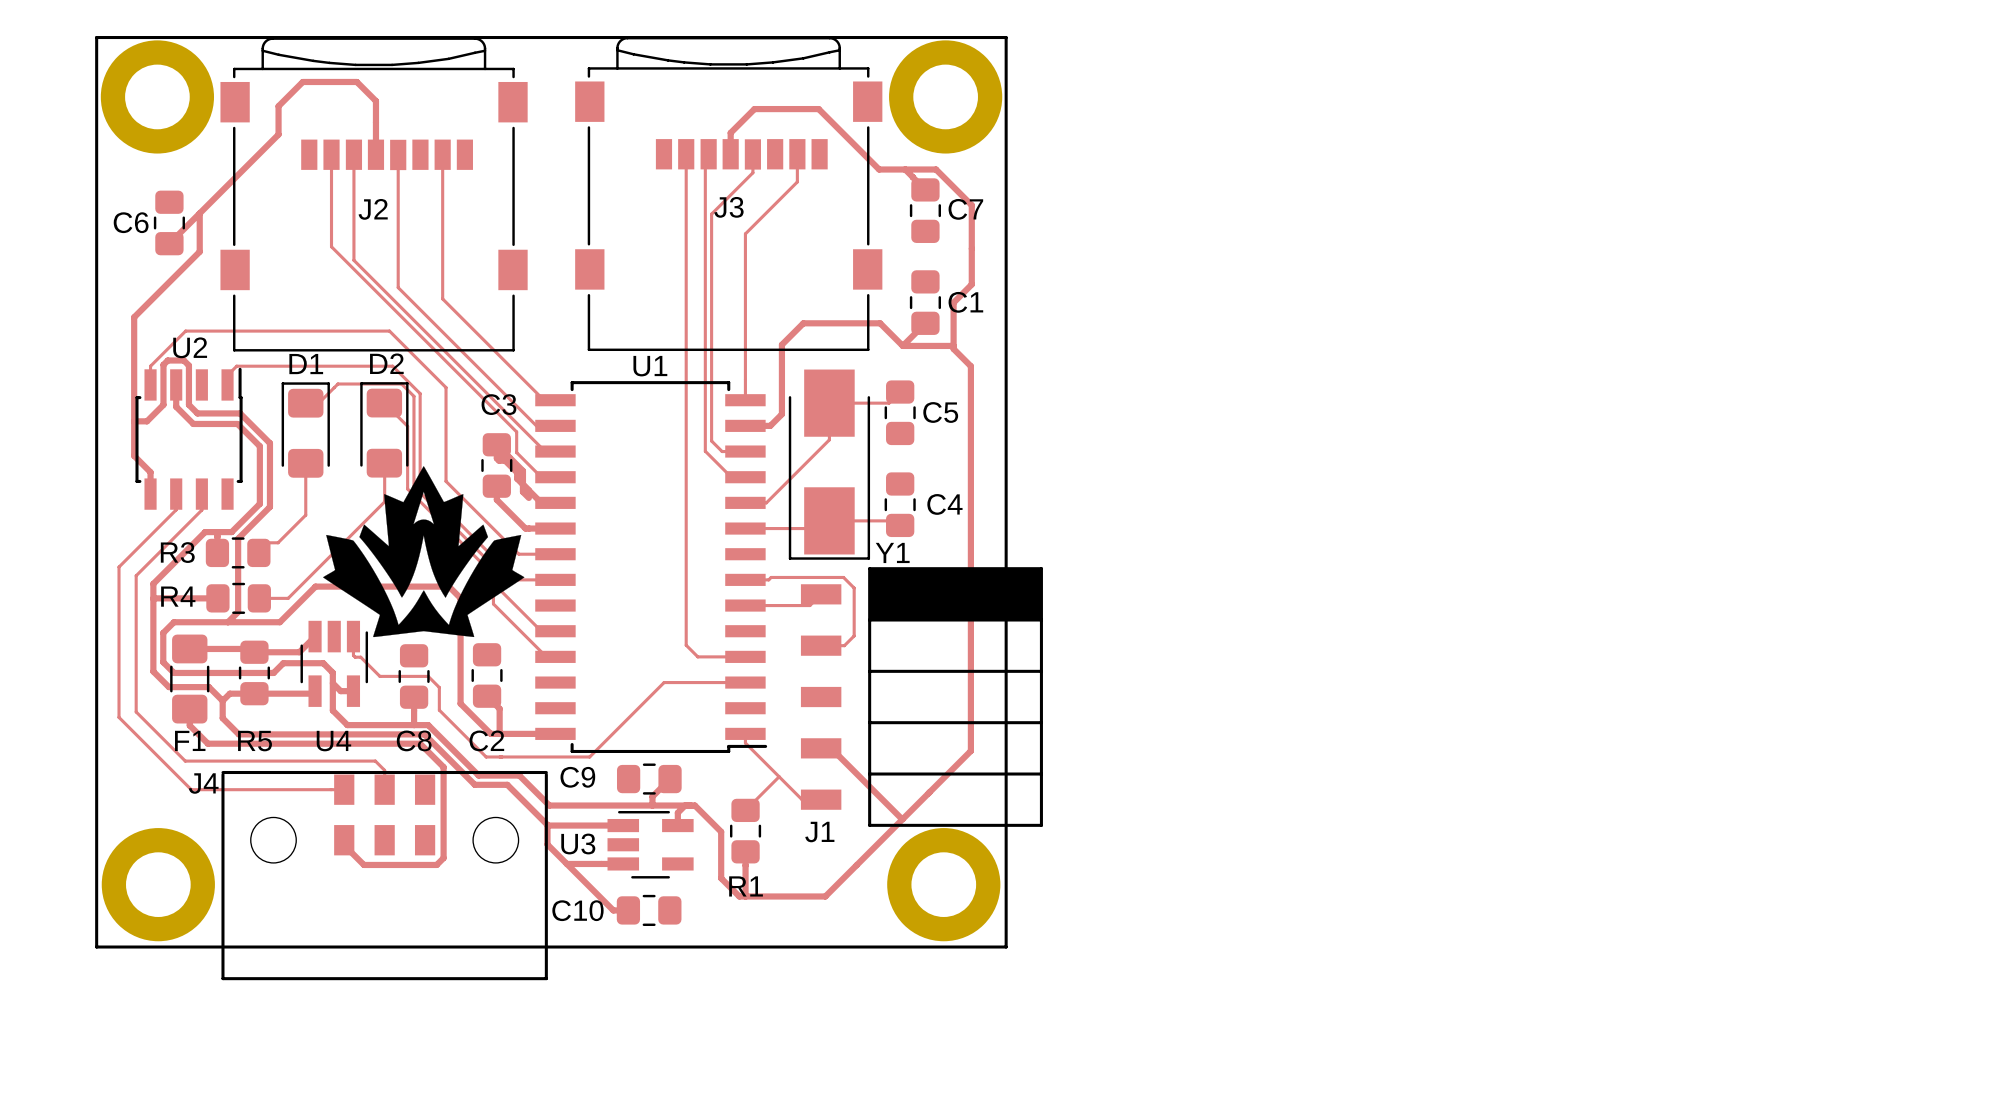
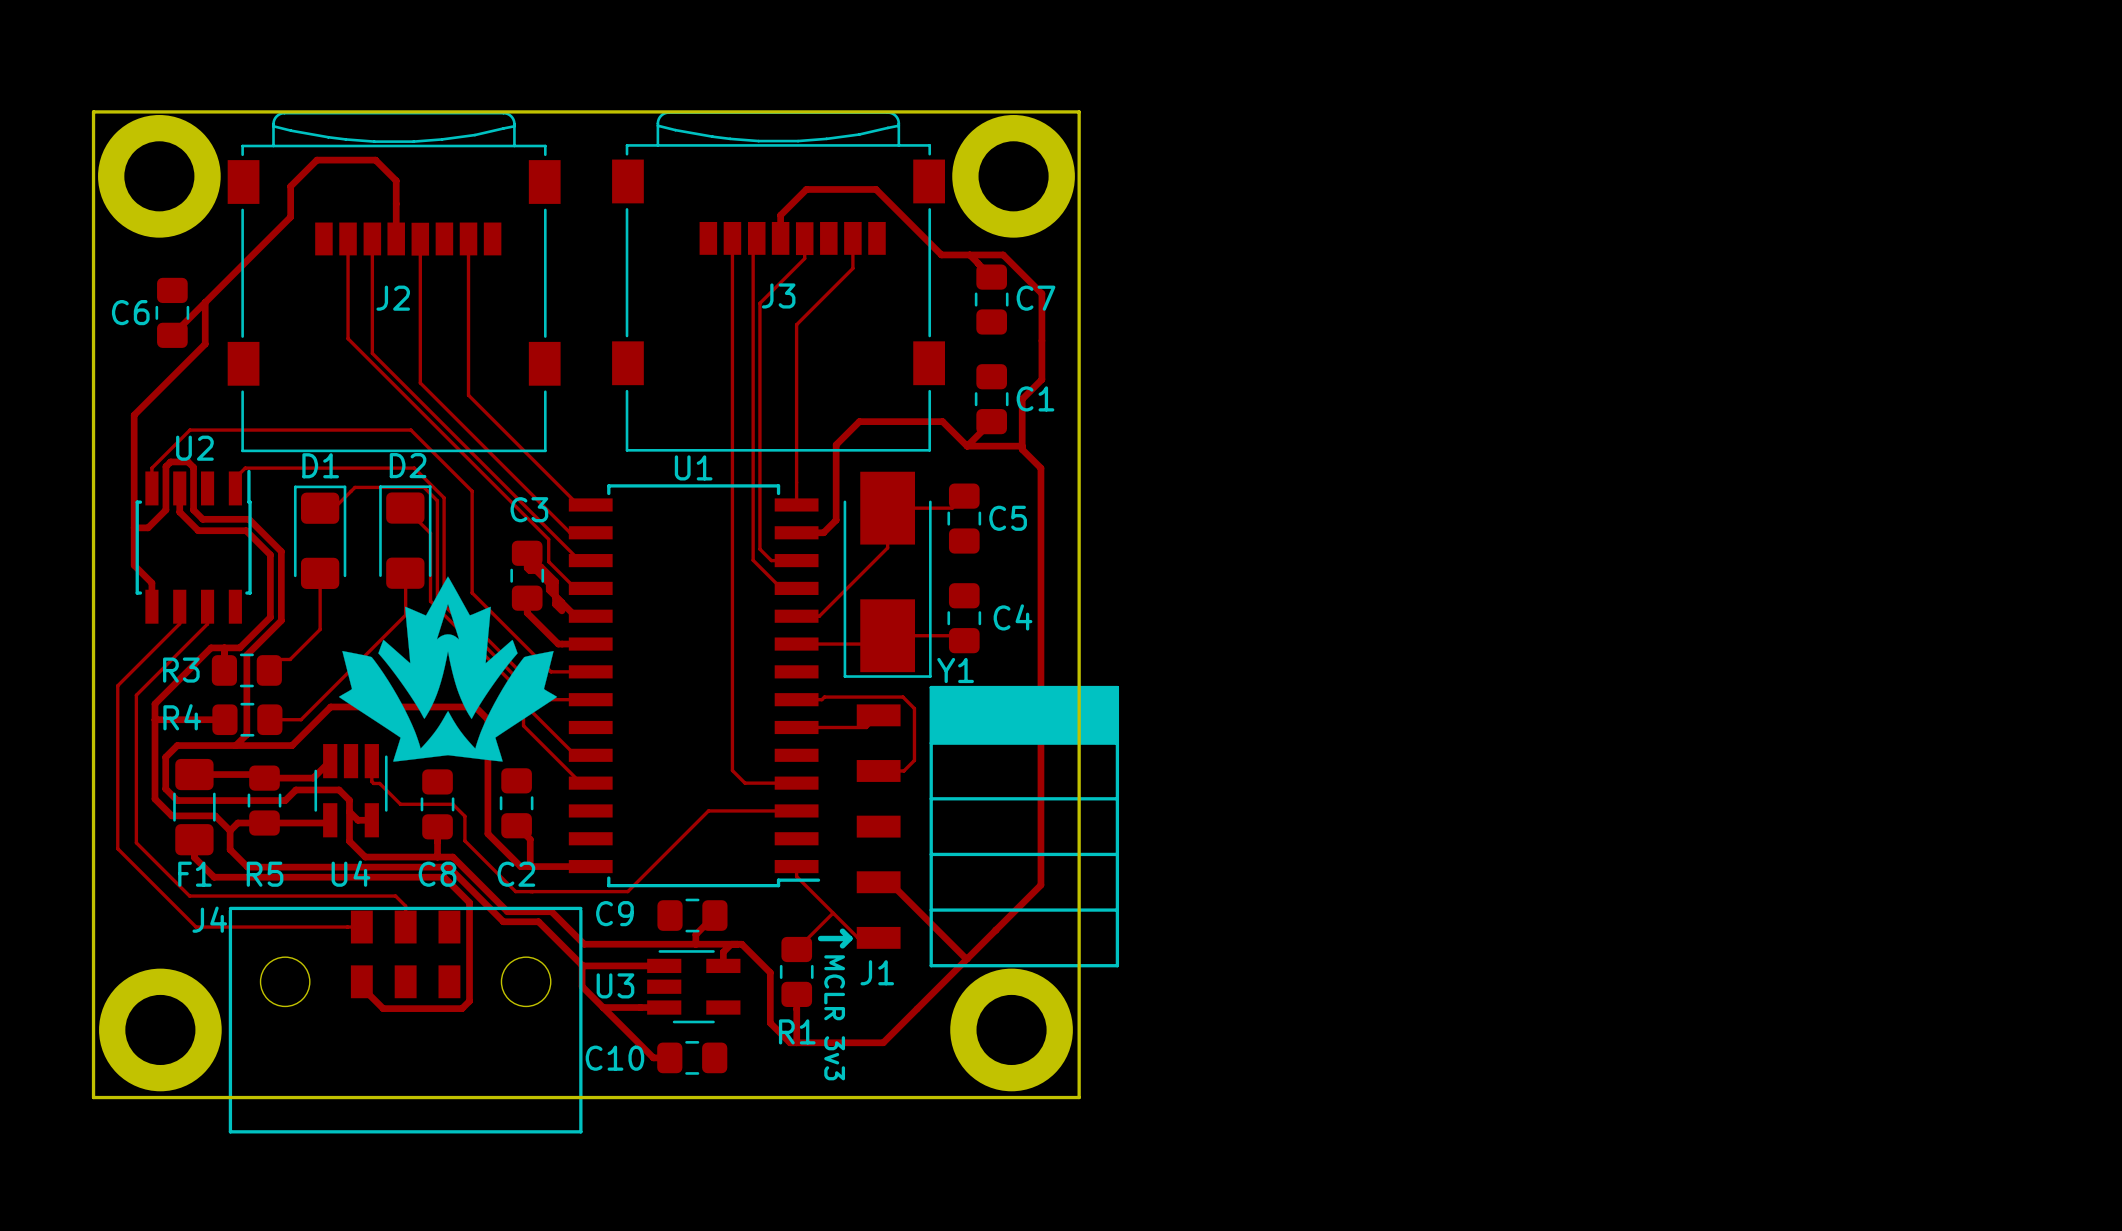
text: none -> ↑ (835, 938)
text: none -> MCLR 3v3 (834, 1017)

